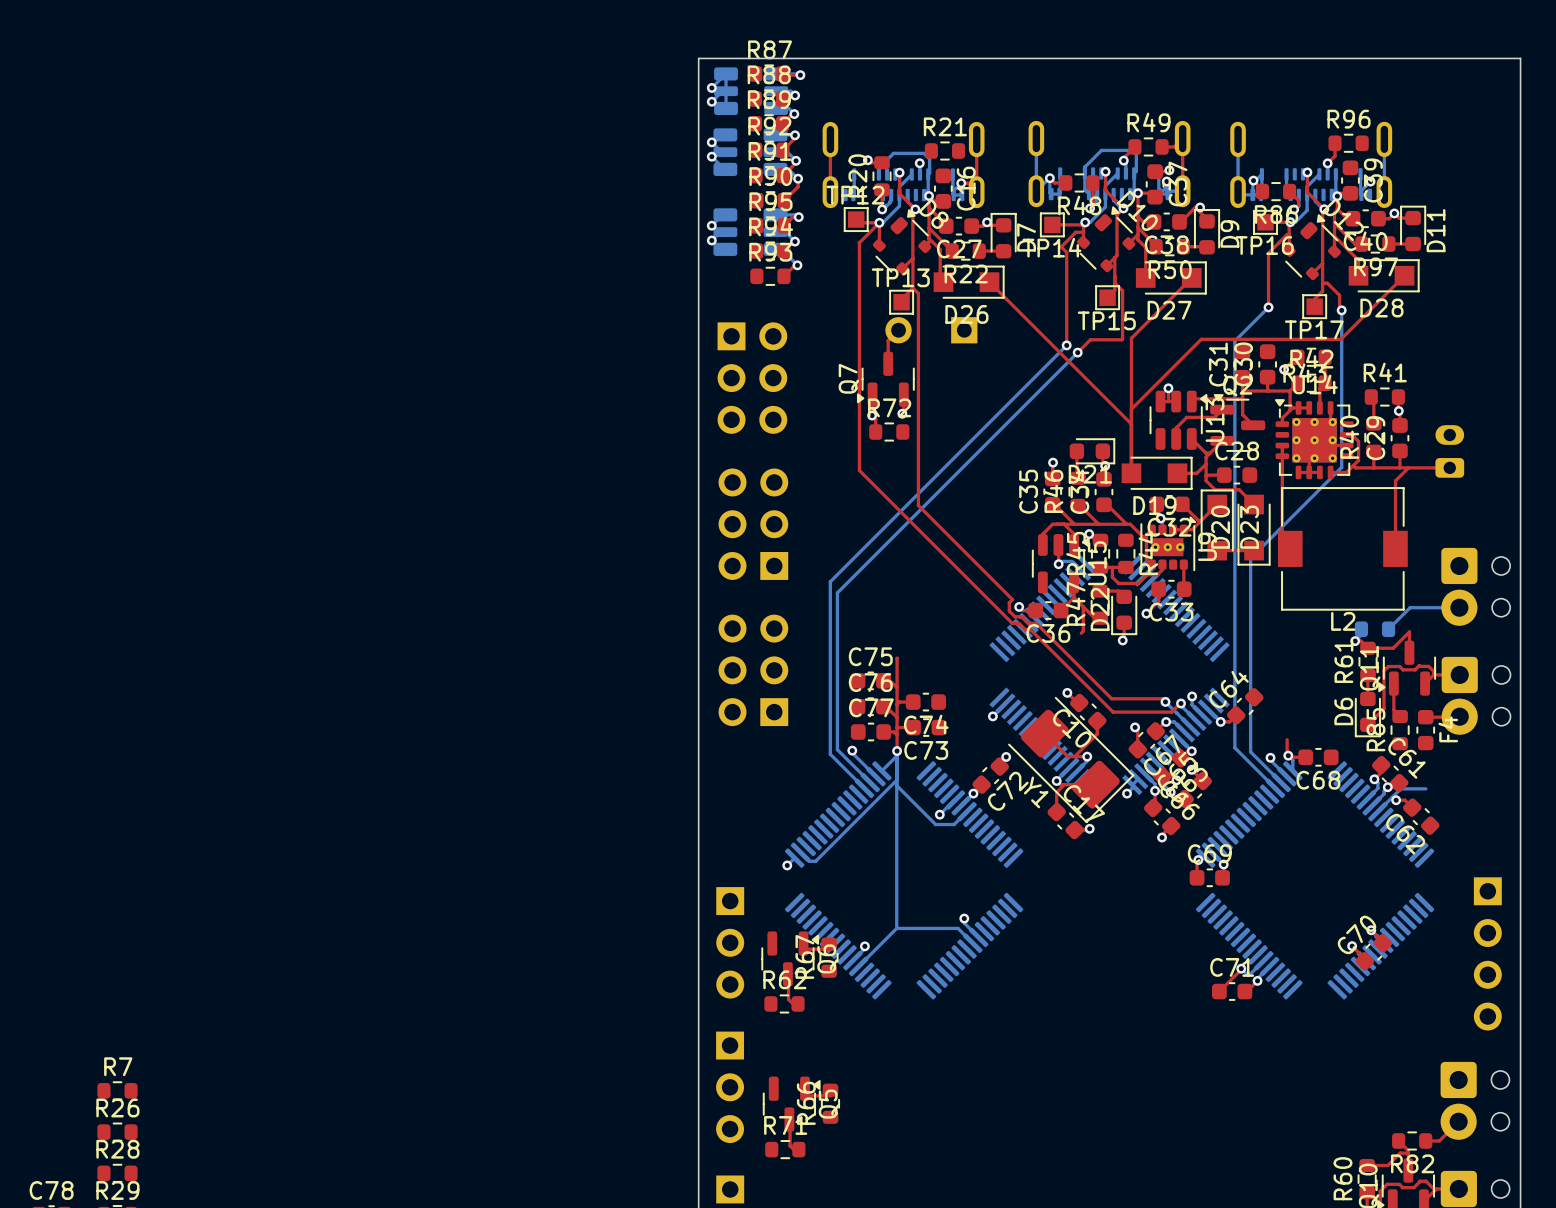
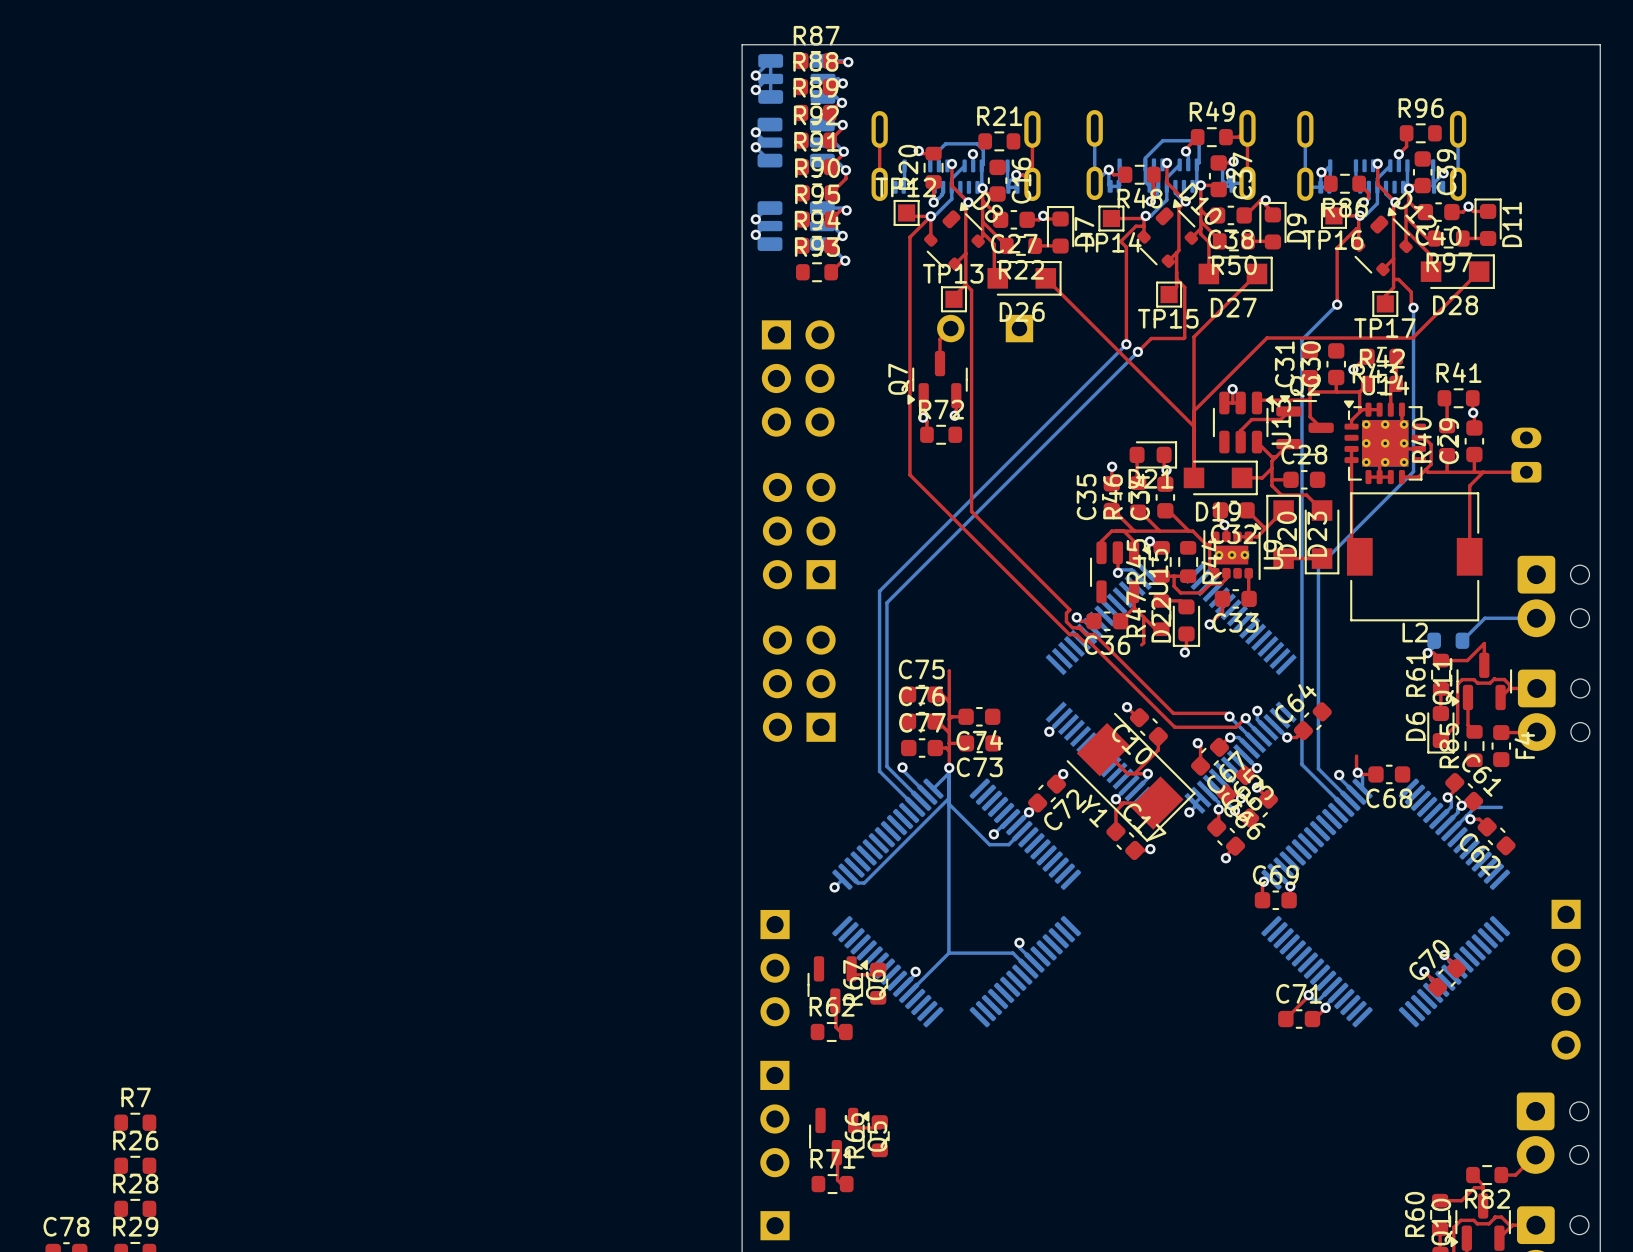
Y1 footprint: [1008, 696, 1135, 824] -> [1066, 712, 1196, 842]

